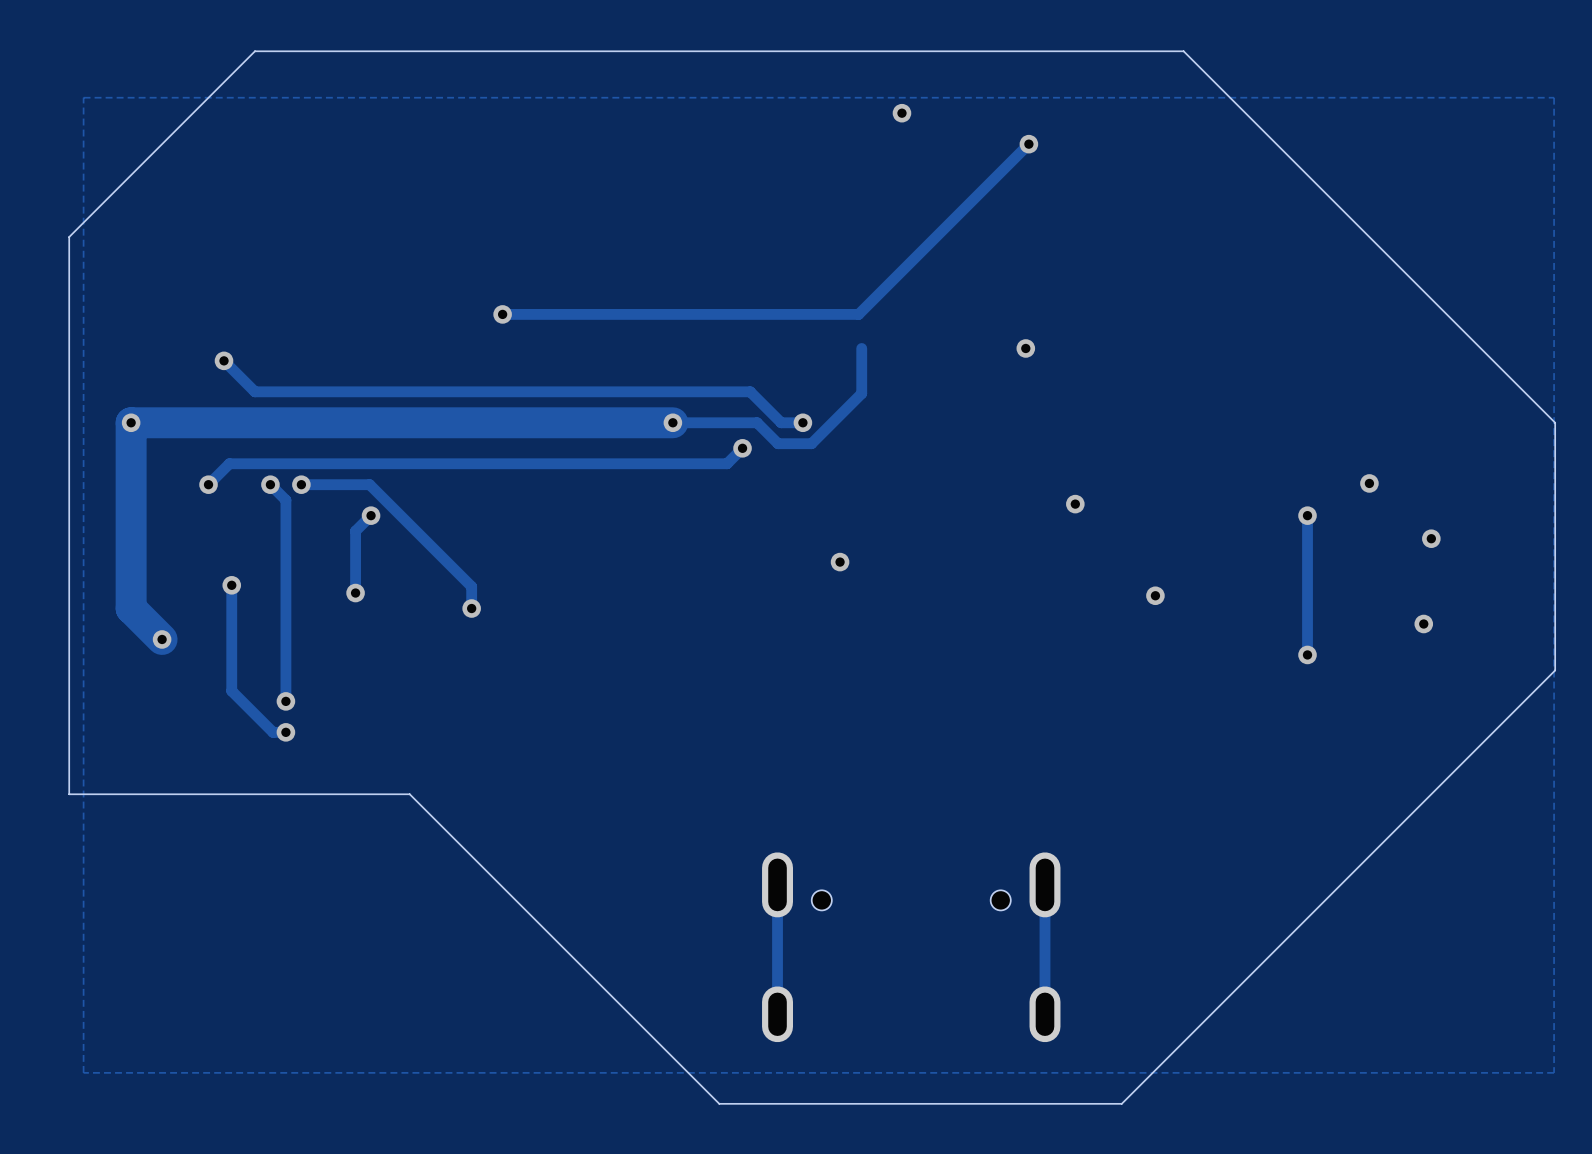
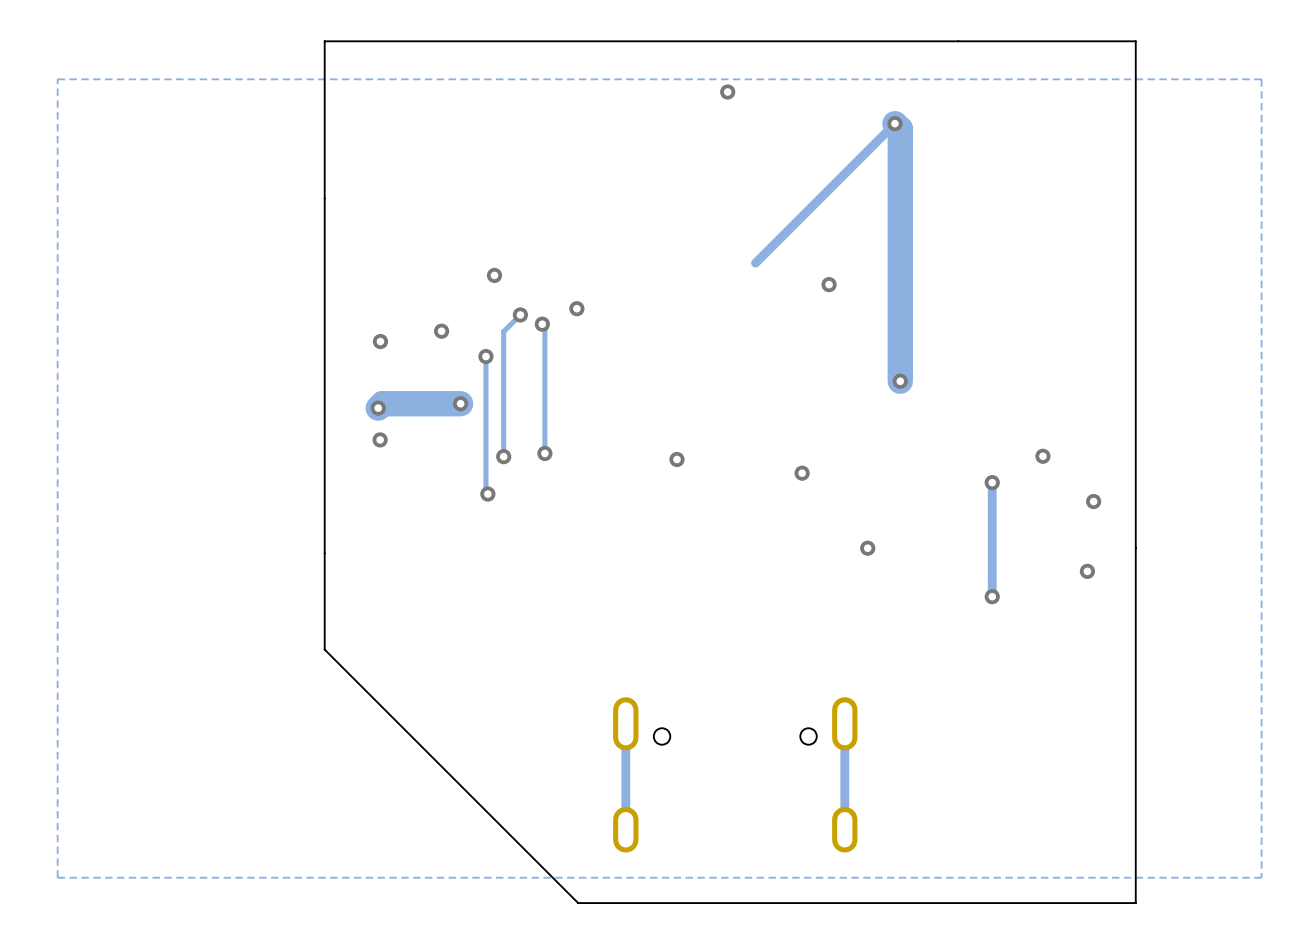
board edge: (409, 51) (254, 51) (69, 237) (69, 794) (409, 794) -> (324, 41) (324, 649)
board edge: (1183, 51) (1555, 422) (1555, 670) (1121, 1103) -> (958, 41) (1135, 41) (1135, 903) (907, 903)
track: (1028, 144) (858, 314) (502, 314) -> none
via position: (1028, 144) -> (894, 123)
via: (502, 314) -> none
track: none -> (755, 263) (894, 123) (900, 129) (900, 381)
via: none -> (494, 275)
track: (861, 348) (861, 393) (811, 443) (778, 443) (757, 422) (131, 422) (131, 608) (162, 639) -> none
track: (224, 360) (254, 391) (750, 391) (781, 422) (802, 422) -> none
via: (224, 360) -> none
via: none -> (576, 308)
track: none -> (520, 314) (503, 331) (503, 456)
via: none -> (520, 314)
track: none -> (542, 324) (544, 326) (544, 453)
via: none -> (542, 324)
via: none -> (441, 331)
via: none -> (380, 341)
via: (131, 422) -> none
via: (672, 422) -> none
via: (802, 422) -> none
track: none -> (485, 356) (485, 492) (487, 494)
via: none -> (485, 356)
track: (742, 448) (727, 463) (229, 463) (208, 484) -> none
via: (742, 448) -> none
via: (1369, 483) -> none
via: (208, 484) -> none
track: (270, 484) (285, 500) (285, 701) -> none
via: (270, 484) -> none
track: (301, 484) (369, 484) (471, 586) (471, 608) -> none
via: (301, 484) -> none
track: none -> (460, 403) (382, 403) (378, 408)
via: none -> (460, 403)
via: none -> (378, 408)
via position: (1075, 504) -> (900, 381)
track: (371, 515) (355, 531) (355, 593) -> none
via: (371, 515) -> none
track: (1307, 515) (1307, 654) -> (992, 482) (992, 596)
via position: (1307, 515) -> (1042, 456)
via: none -> (380, 439)
via: (1431, 538) -> none
via: none -> (544, 453)
via: none -> (503, 456)
via: none -> (802, 473)
track: (231, 585) (231, 691) (273, 732) (285, 732) -> none
via: (231, 585) -> none
via: none -> (992, 482)
via: (355, 593) -> none
via: (1155, 595) -> none
via: none -> (487, 494)
via: (471, 608) -> none
via: none -> (1093, 501)
via: (1423, 623) -> none
via: (162, 639) -> none
via: (1307, 654) -> none
via: none -> (867, 548)
via: none -> (1087, 571)
via: (285, 701) -> none
via: none -> (992, 596)
via: (285, 732) -> none

